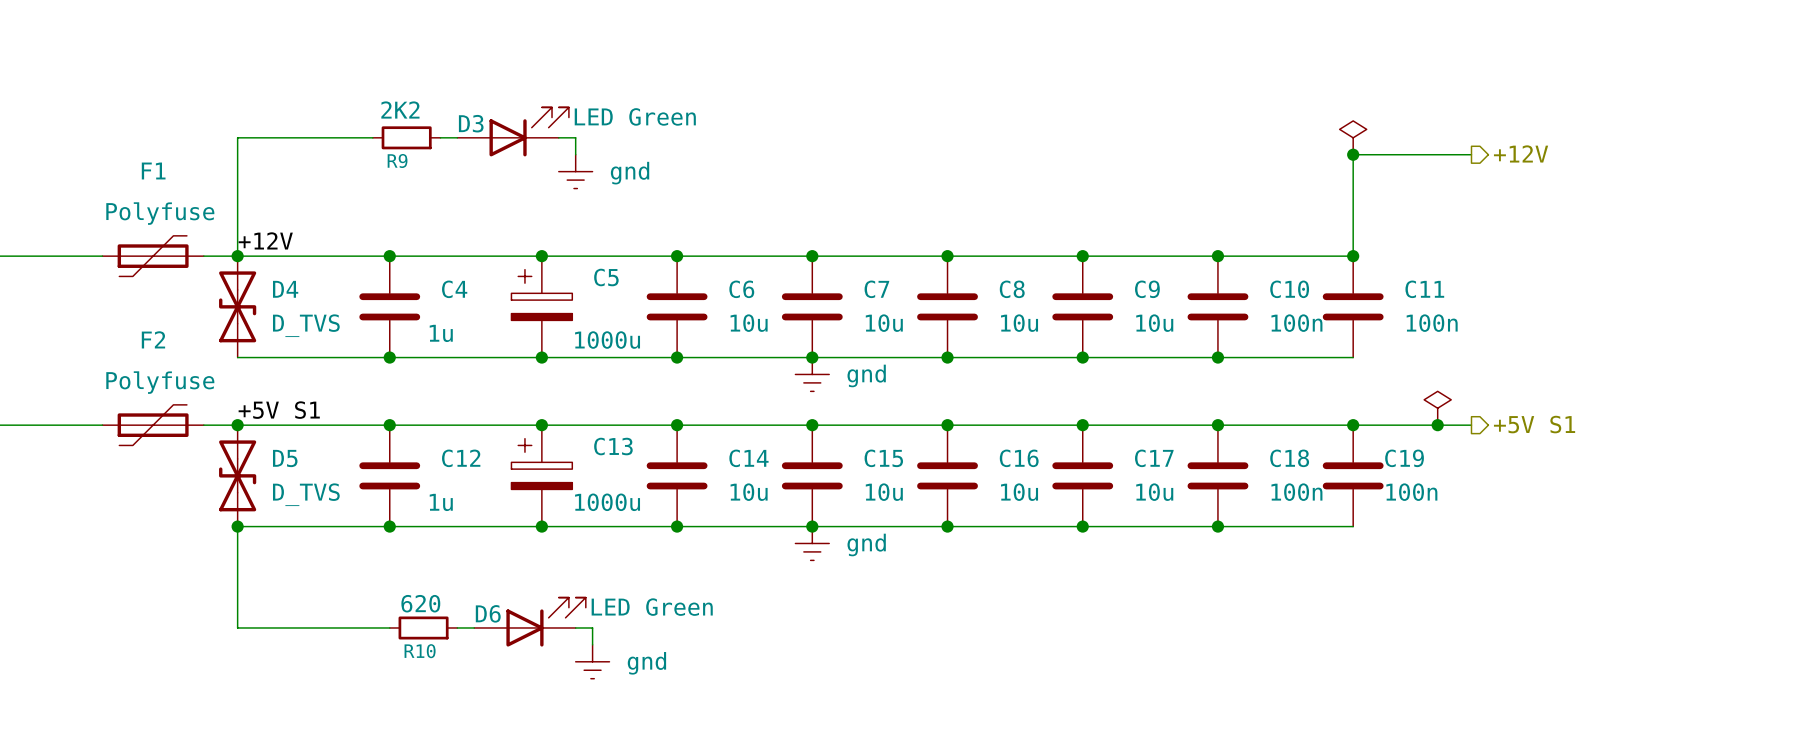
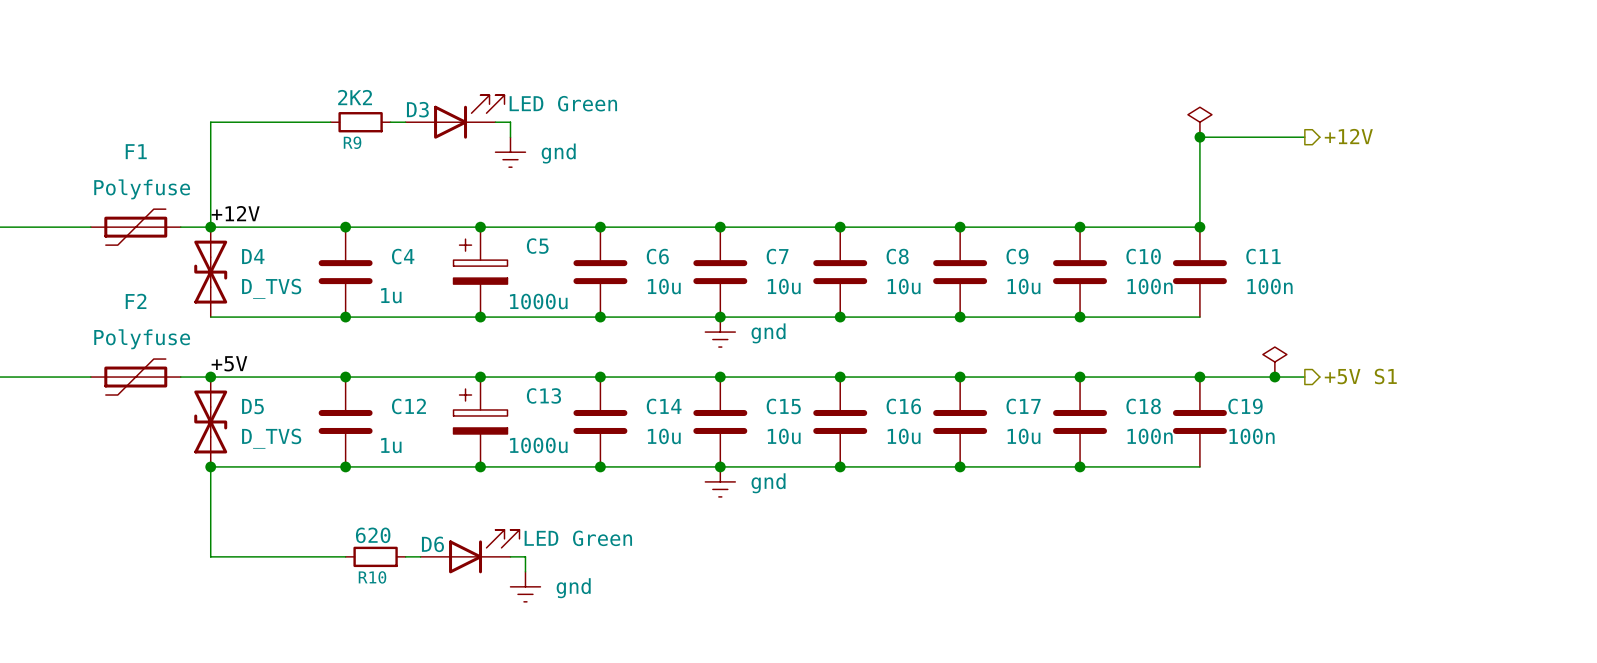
label: +5V S1 (279, 410) -> +5V (229, 363)

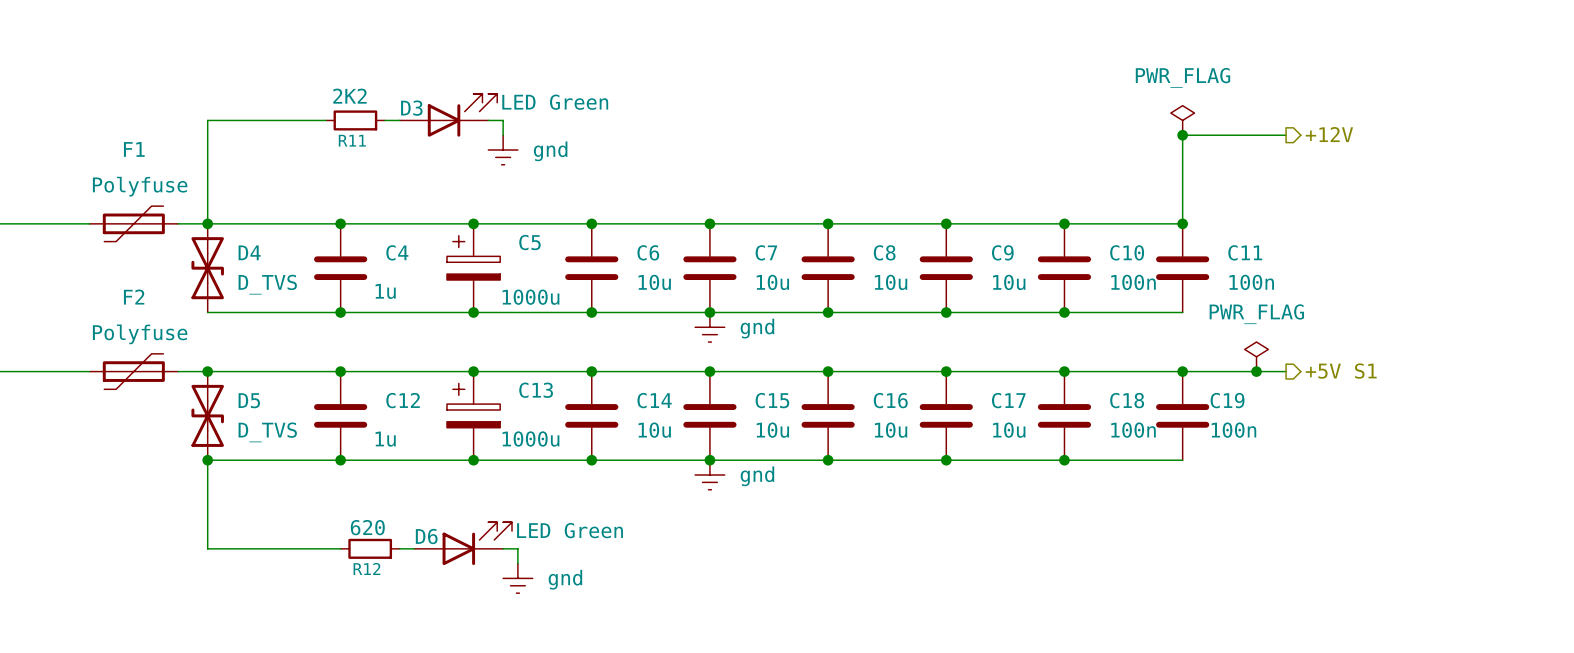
power symbol text: none -> PWR_FLAG (1182, 77)
R9 name: R9 (352, 142) -> R11 (352, 140)
label: +12V (235, 213) -> none
power symbol text: none -> PWR_FLAG (1256, 314)
label: +5V (229, 363) -> none
R10 name: R10 (372, 577) -> R12 (366, 568)

